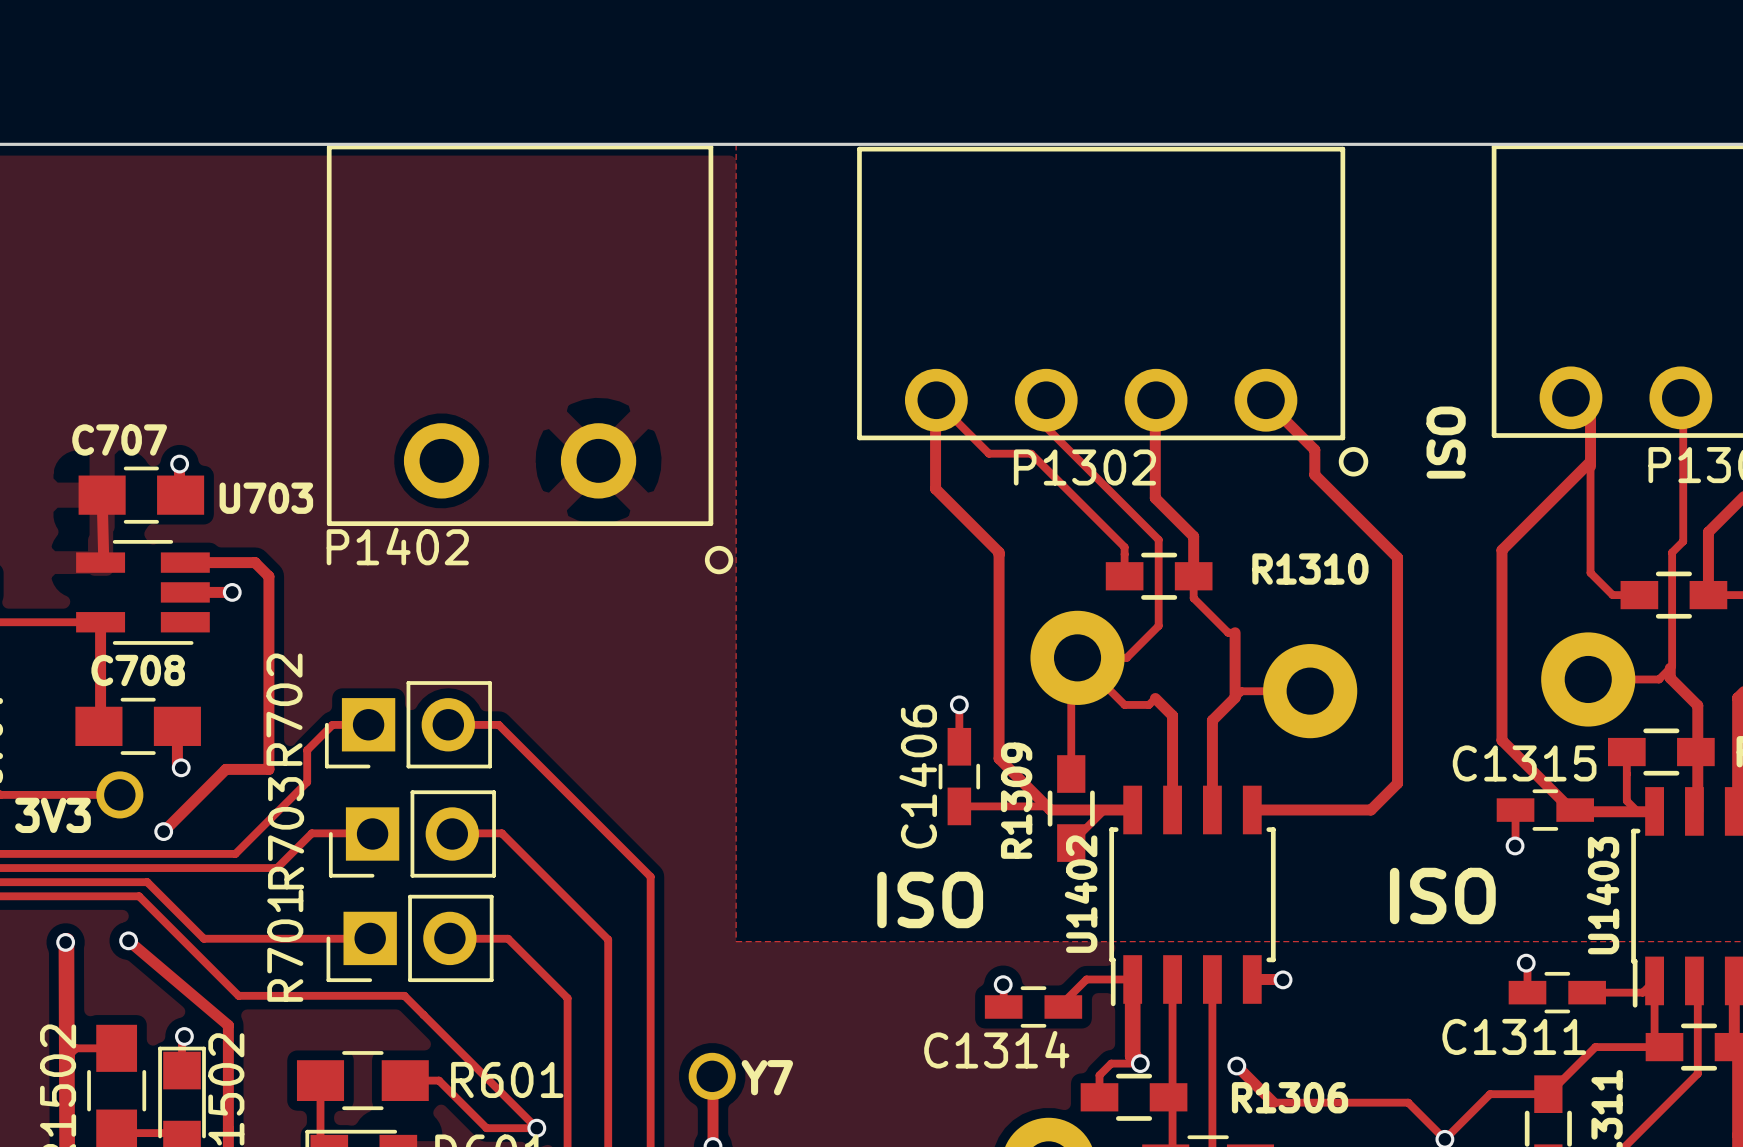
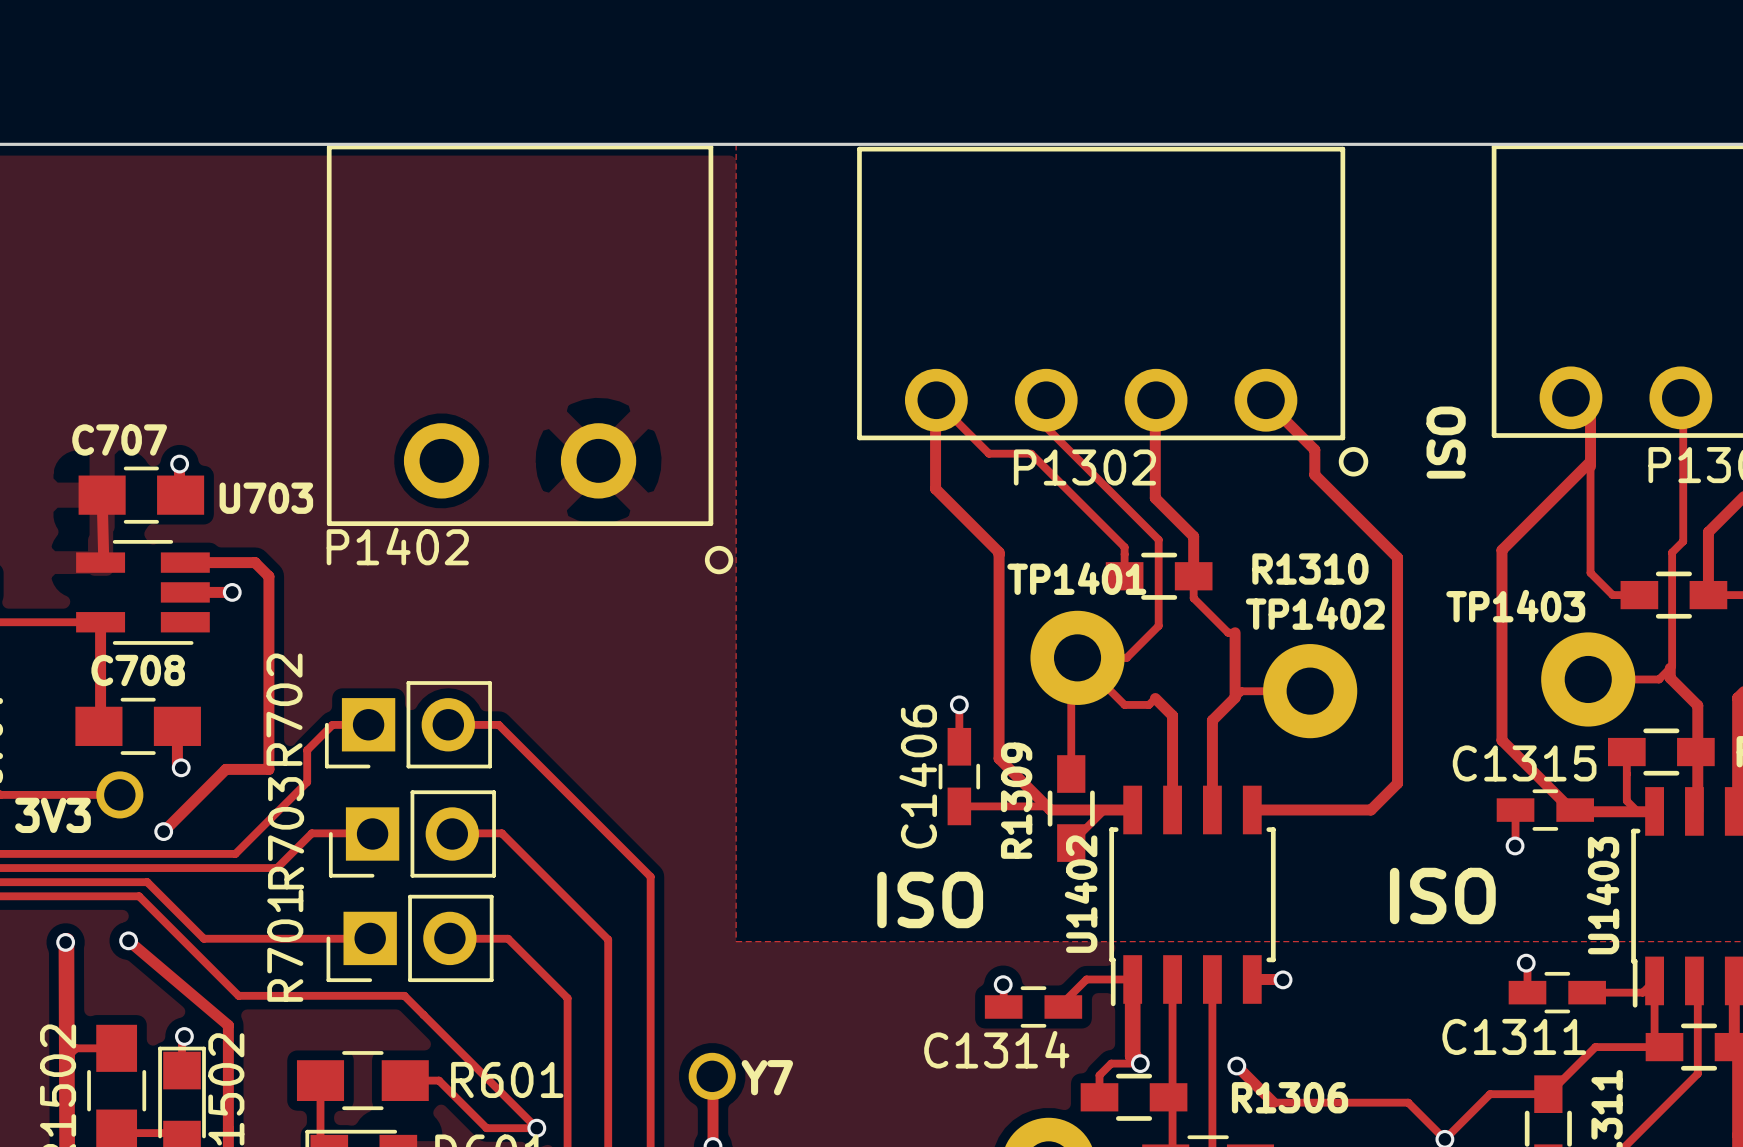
TP1401 name: none -> TP1401 (1076, 578)
TP1403 name: none -> TP1403 (1515, 606)
TP1402 name: none -> TP1402 (1315, 613)

